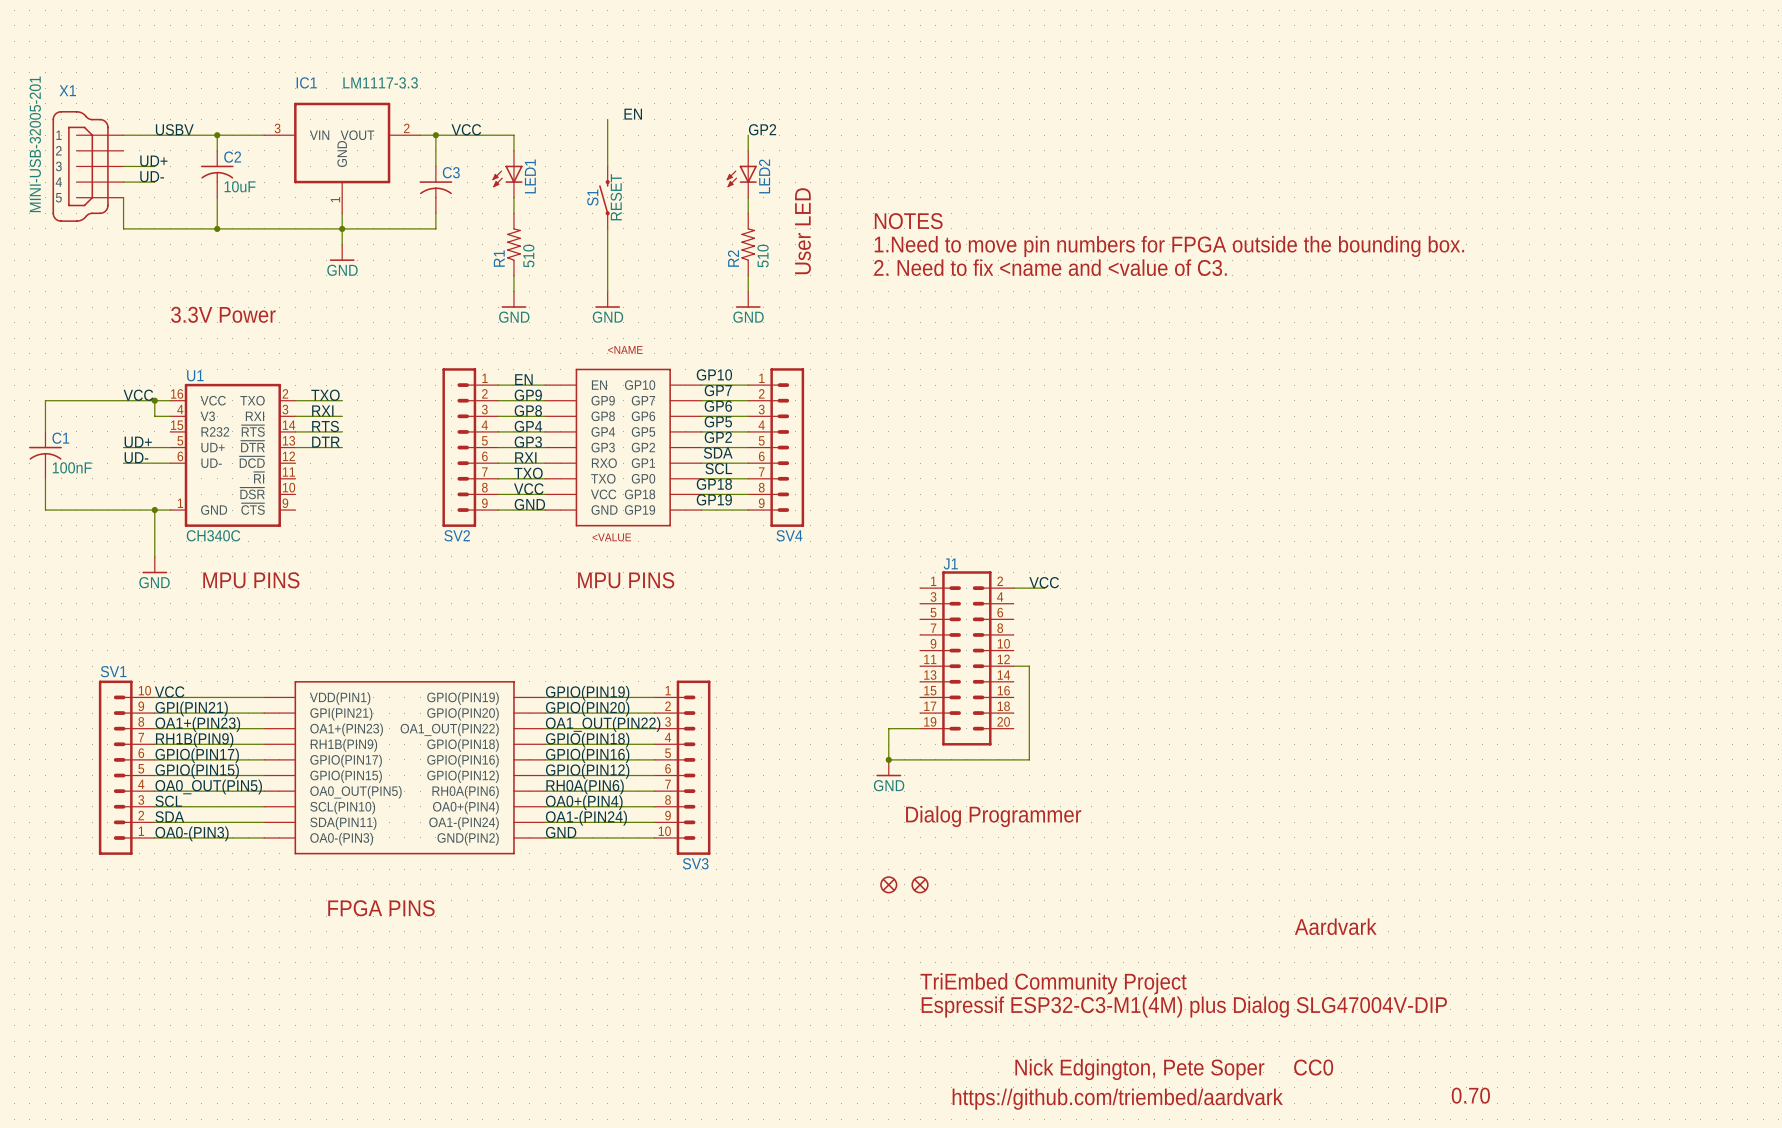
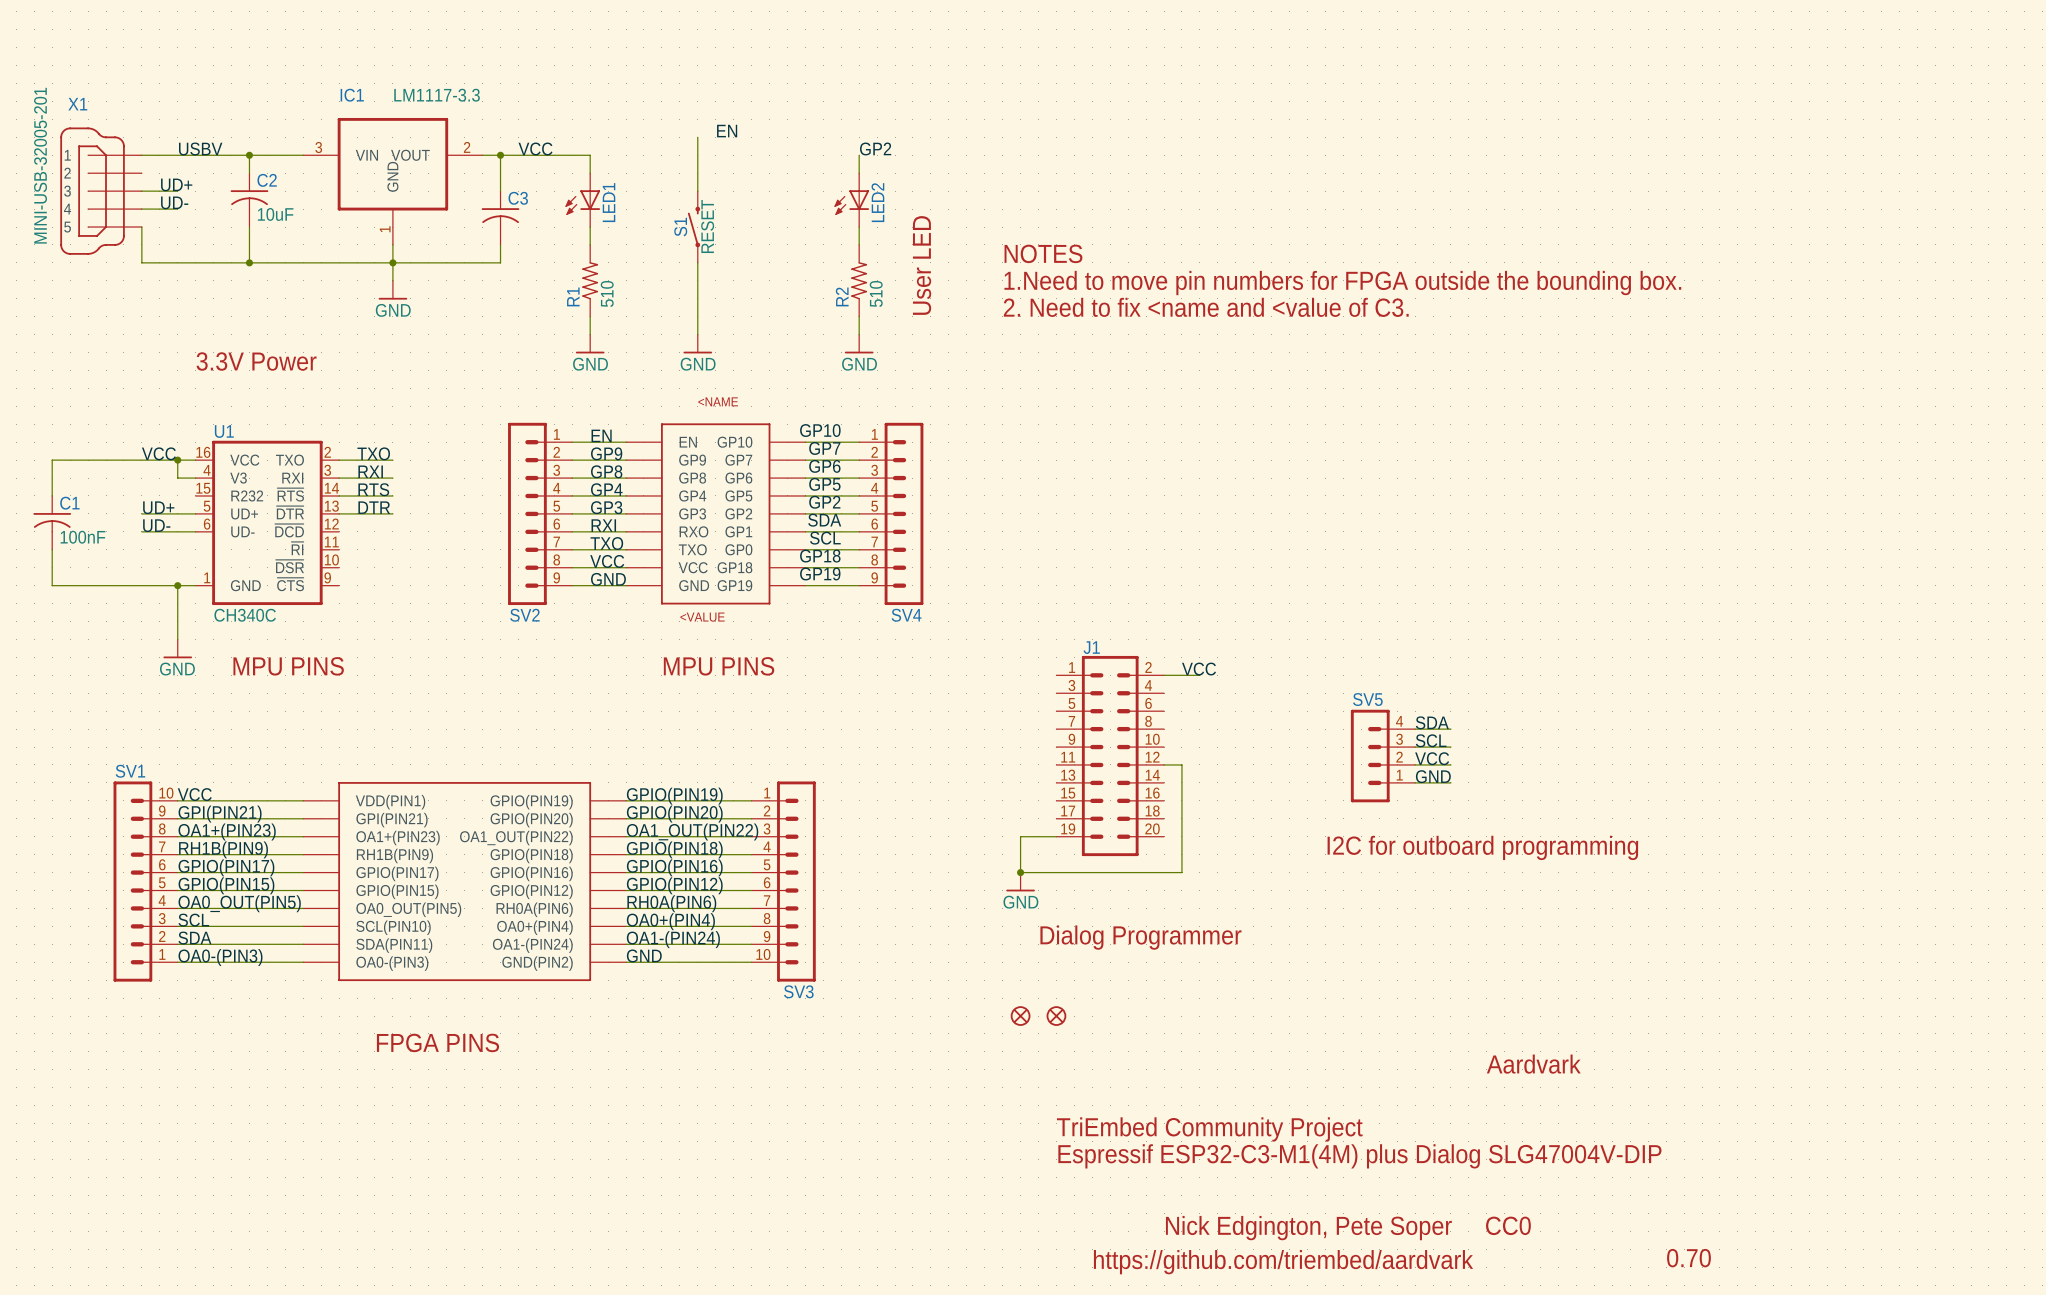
label: none -> SDA (1432, 722)
wire: none -> (1415, 729) (1450, 729)
label: none -> SCL (1431, 740)
wire: none -> (1415, 747) (1450, 747)
SV5: none -> (1382, 756)
label: none -> VCC (1432, 758)
wire: none -> (1415, 764) (1450, 764)
label: none -> GND (1433, 776)
wire: none -> (1415, 782) (1450, 782)
text: none -> I2C for outboard programming (1482, 847)

